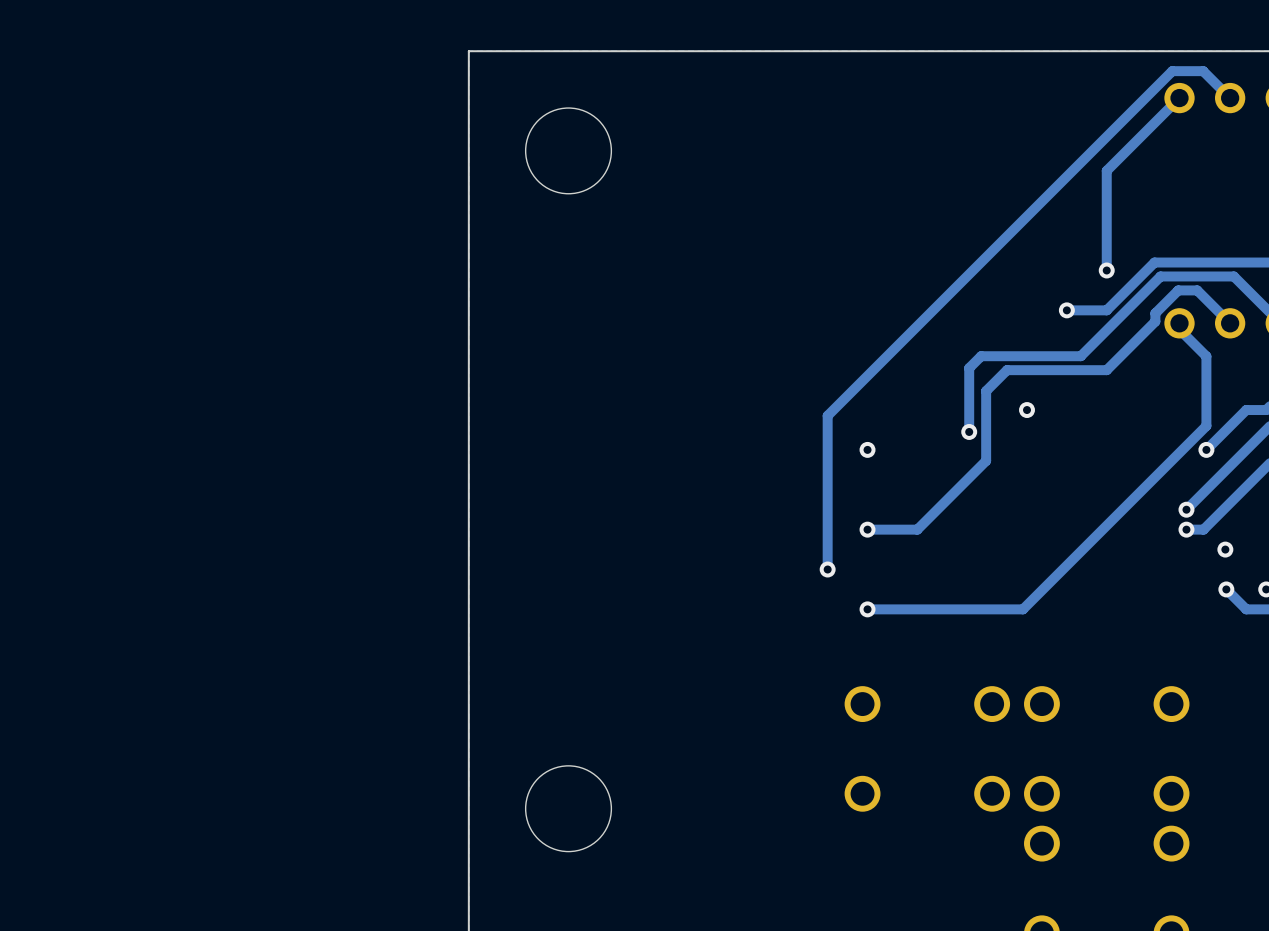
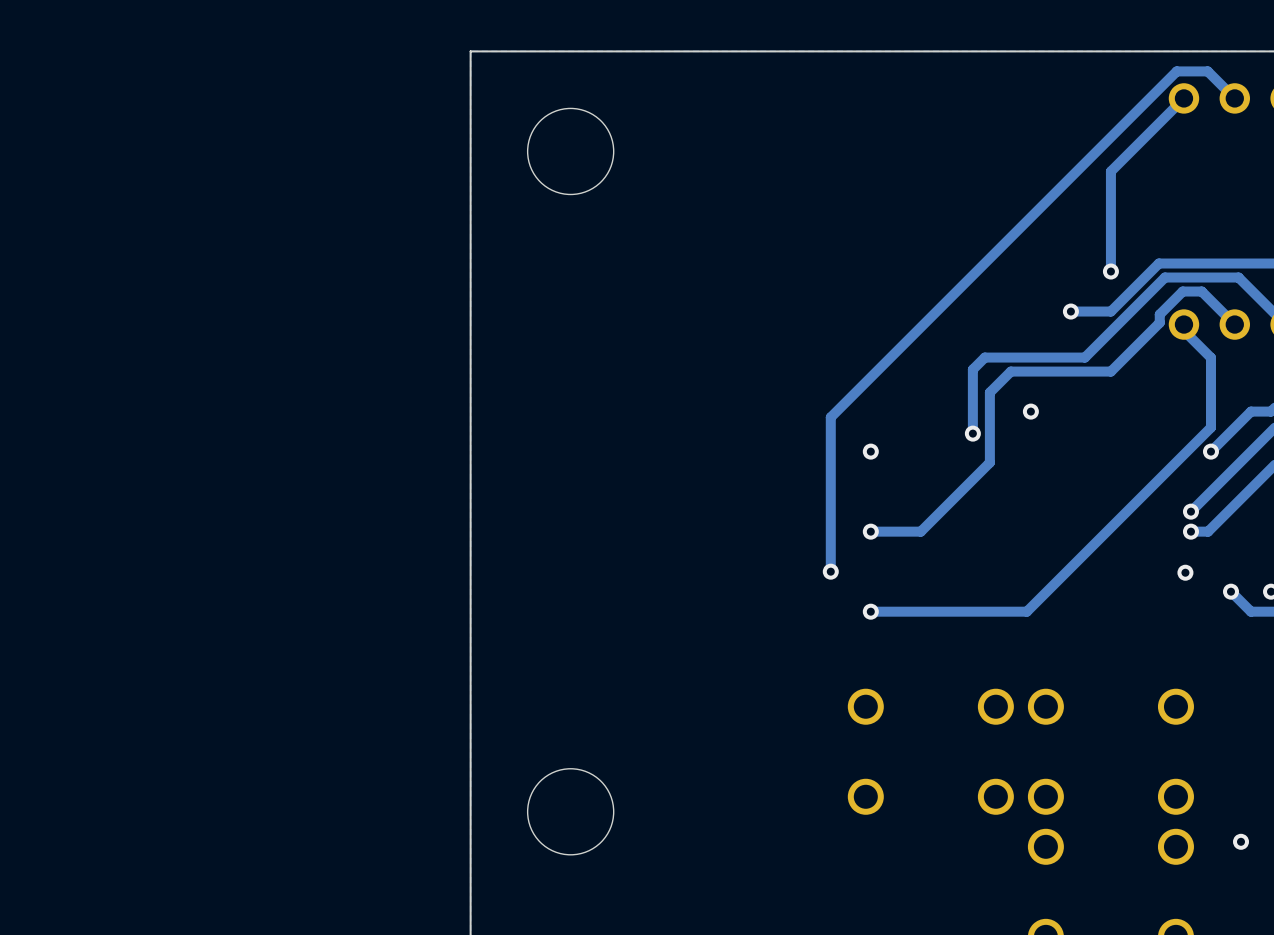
via position: (1225, 549) -> (1185, 572)
via: none -> (1241, 841)

